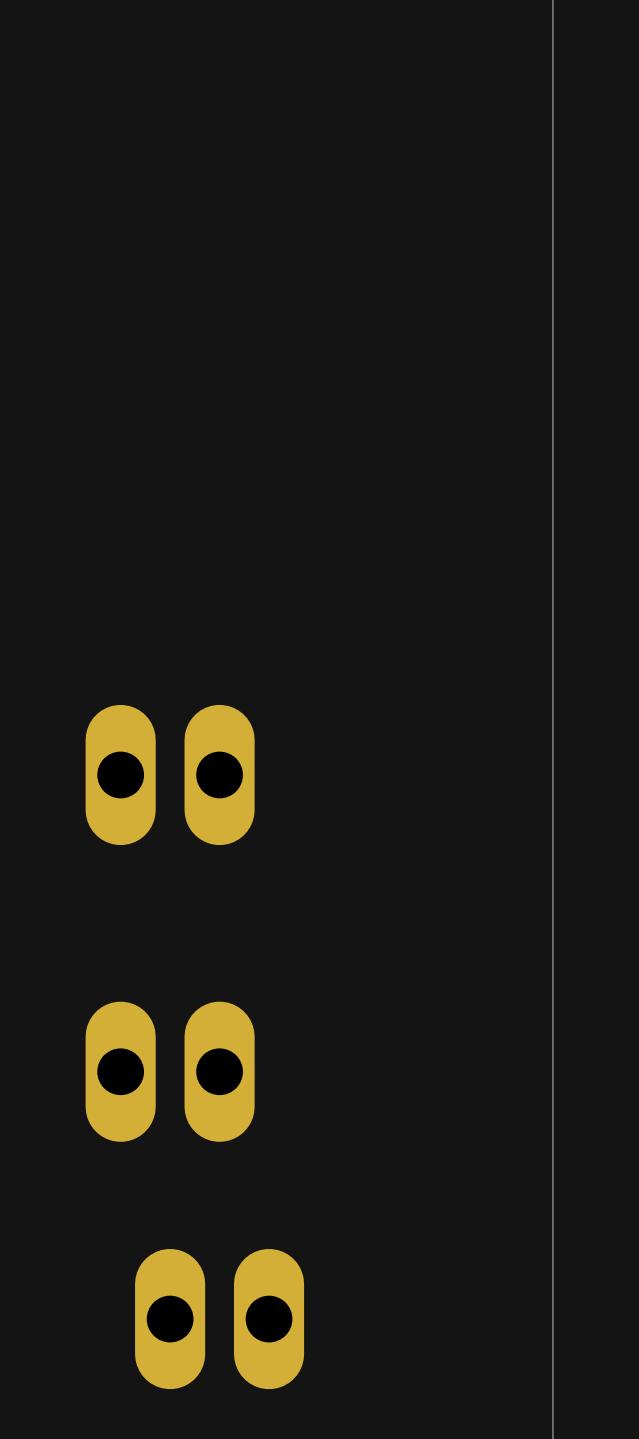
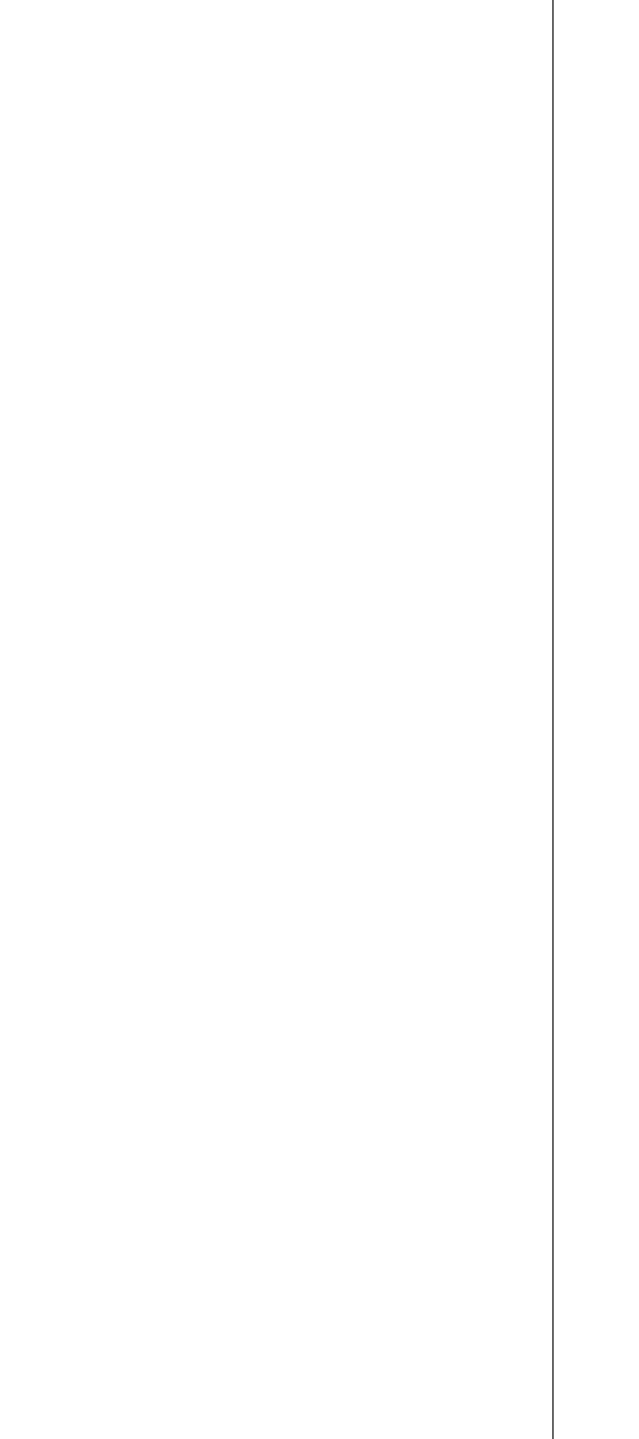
part: (170, 774) -> none
part: (170, 1071) -> none
part: (219, 1319) -> none

